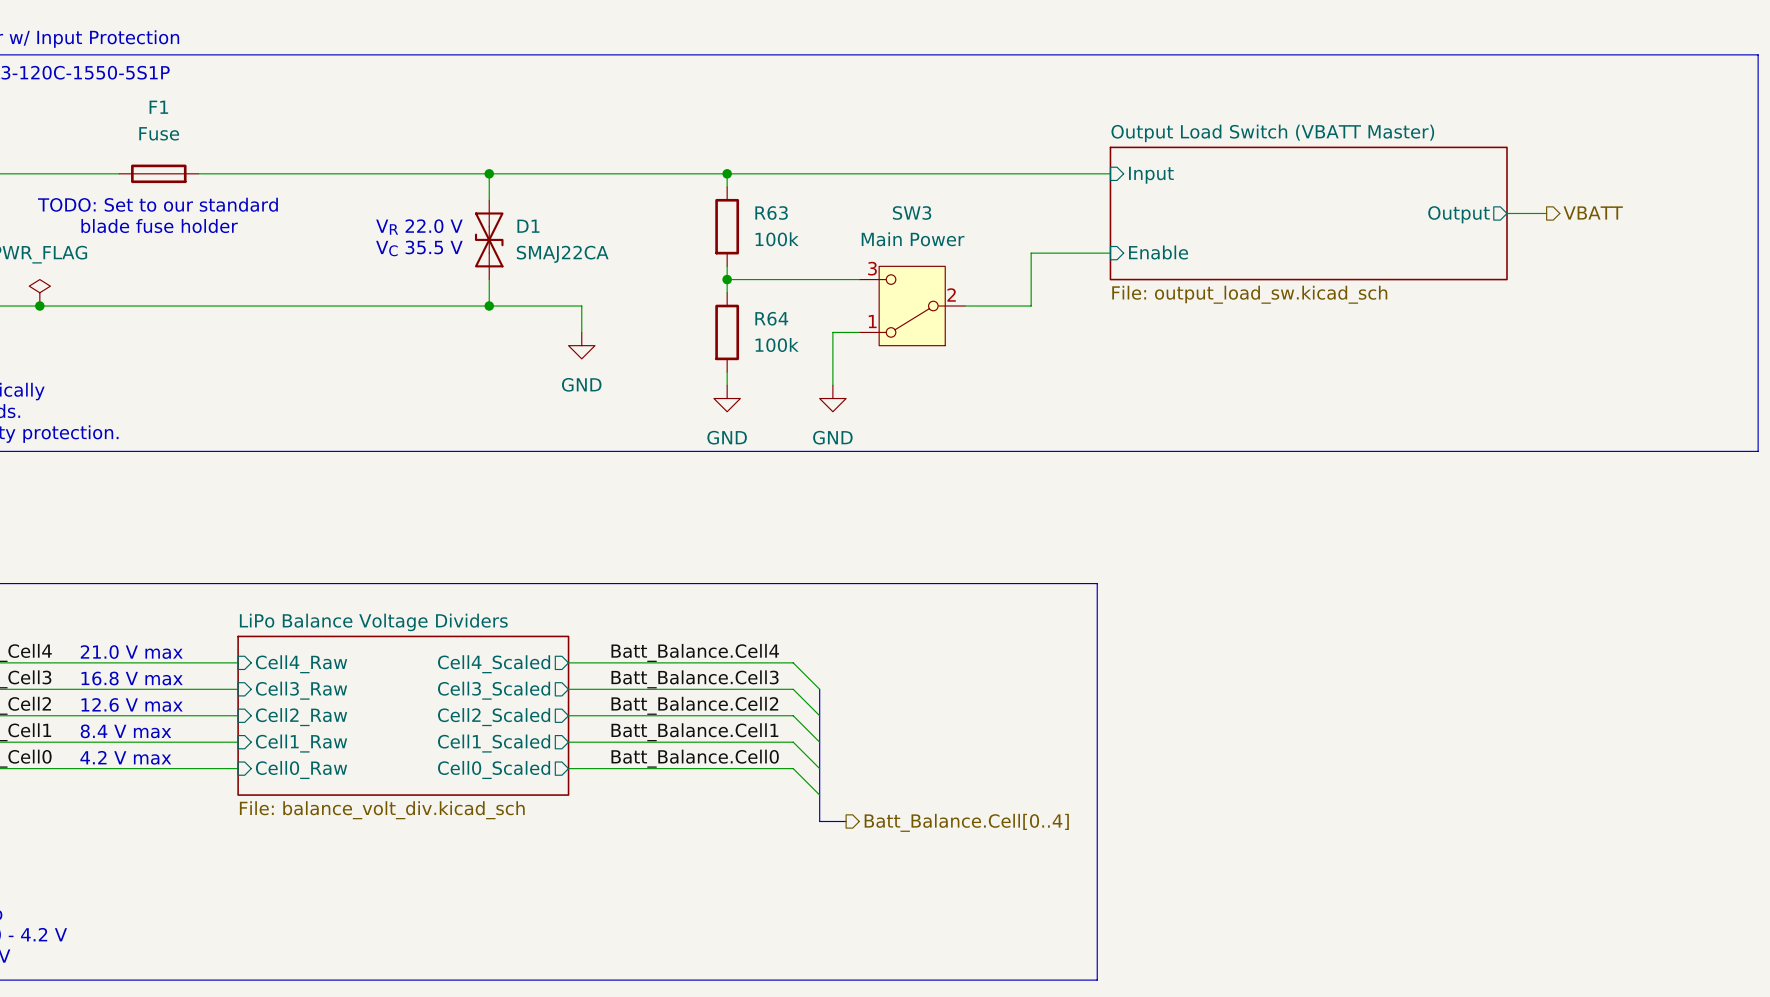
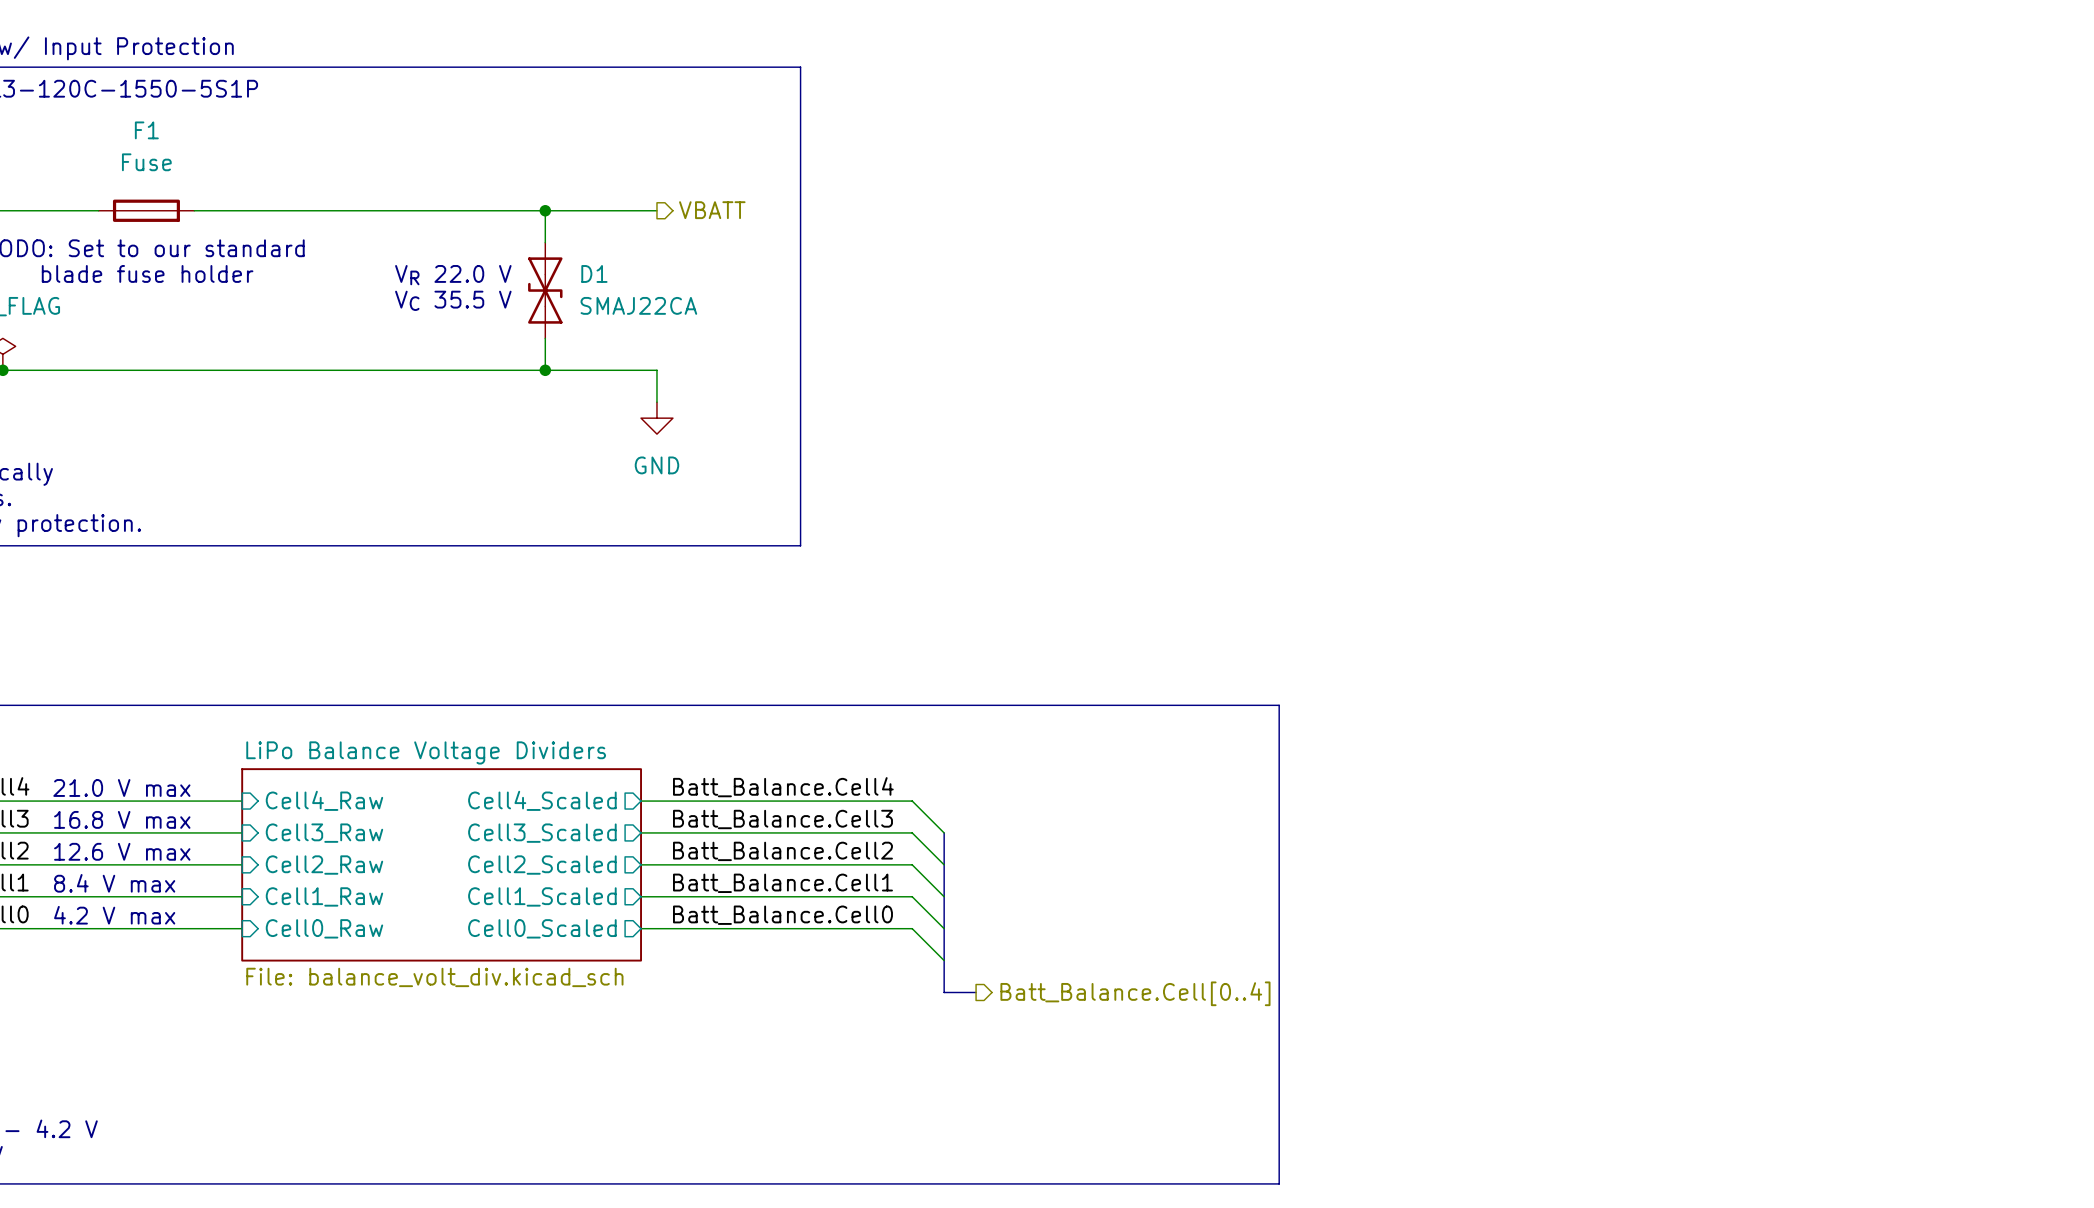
line: (700, 54) (1758, 54) (1758, 451) (700, 451) -> (800, 67) (800, 545)
wire: (581, 173) (1110, 173) -> none
hierarchical label: none -> VBATT (712, 210)
wire: (727, 173) (727, 187) -> none
junction: (727, 173) -> none
sheet pin: Input (1151, 175) -> none
hierarchical label: VBATT (1593, 212) -> none
sheet Output Load Switch (VBATT Master): File: output_load_sw.kicad_sch (1308, 213) -> none
wire: (1506, 213) (1546, 213) -> none
sheet pin: Output (1459, 214) -> none
R63: 100k (727, 226) -> none
sheet pin: Enable (1158, 252) -> none
wire: (1110, 253) (1031, 253) (1031, 306) (965, 306) -> none
wire: (727, 266) (727, 292) -> none
wire: (727, 279) (859, 279) -> none
junction: (727, 279) -> none
SW3: Main Power (912, 306) -> none
R64: 100k (727, 332) -> none
wire: (859, 332) (832, 332) (832, 385) -> none
wire: (727, 372) (727, 385) -> none
power symbol: GND (727, 398) -> none
power symbol: GND (832, 398) -> none

